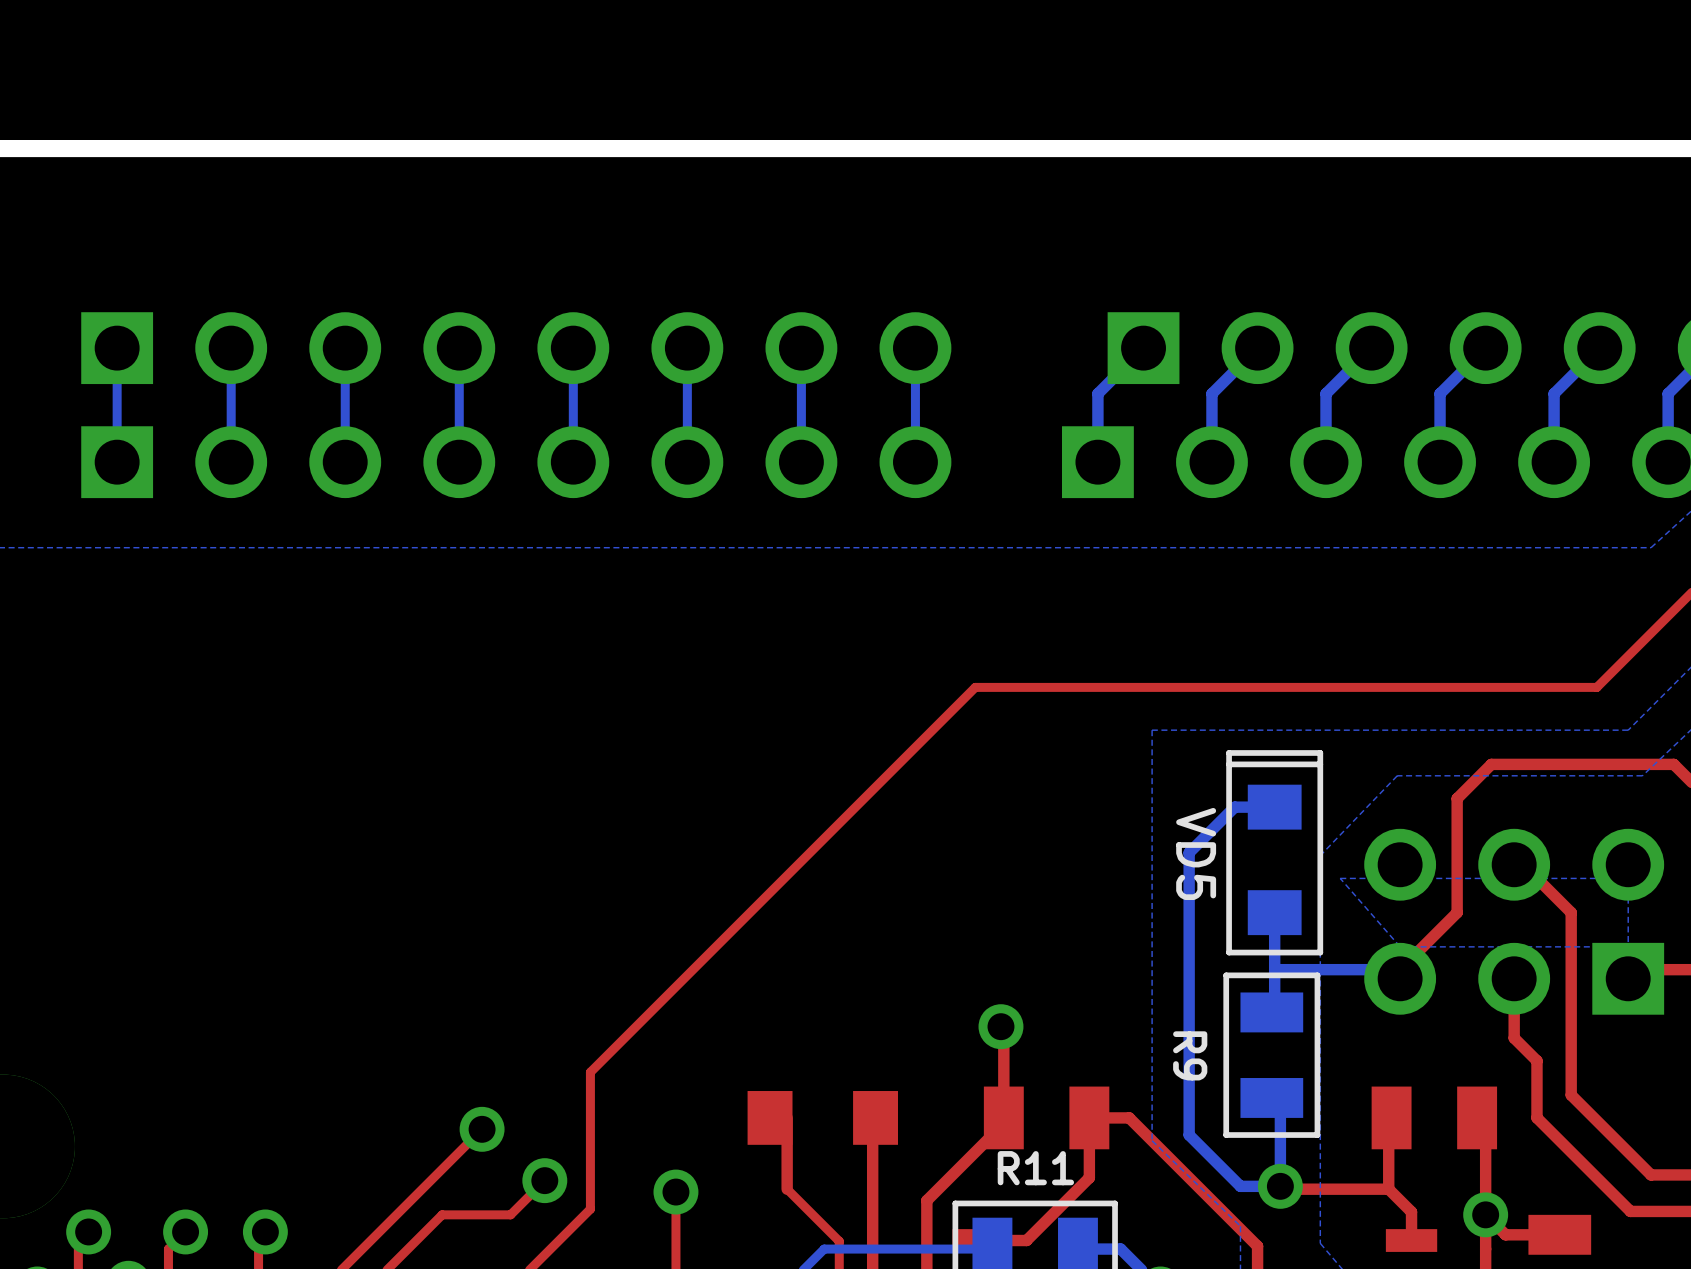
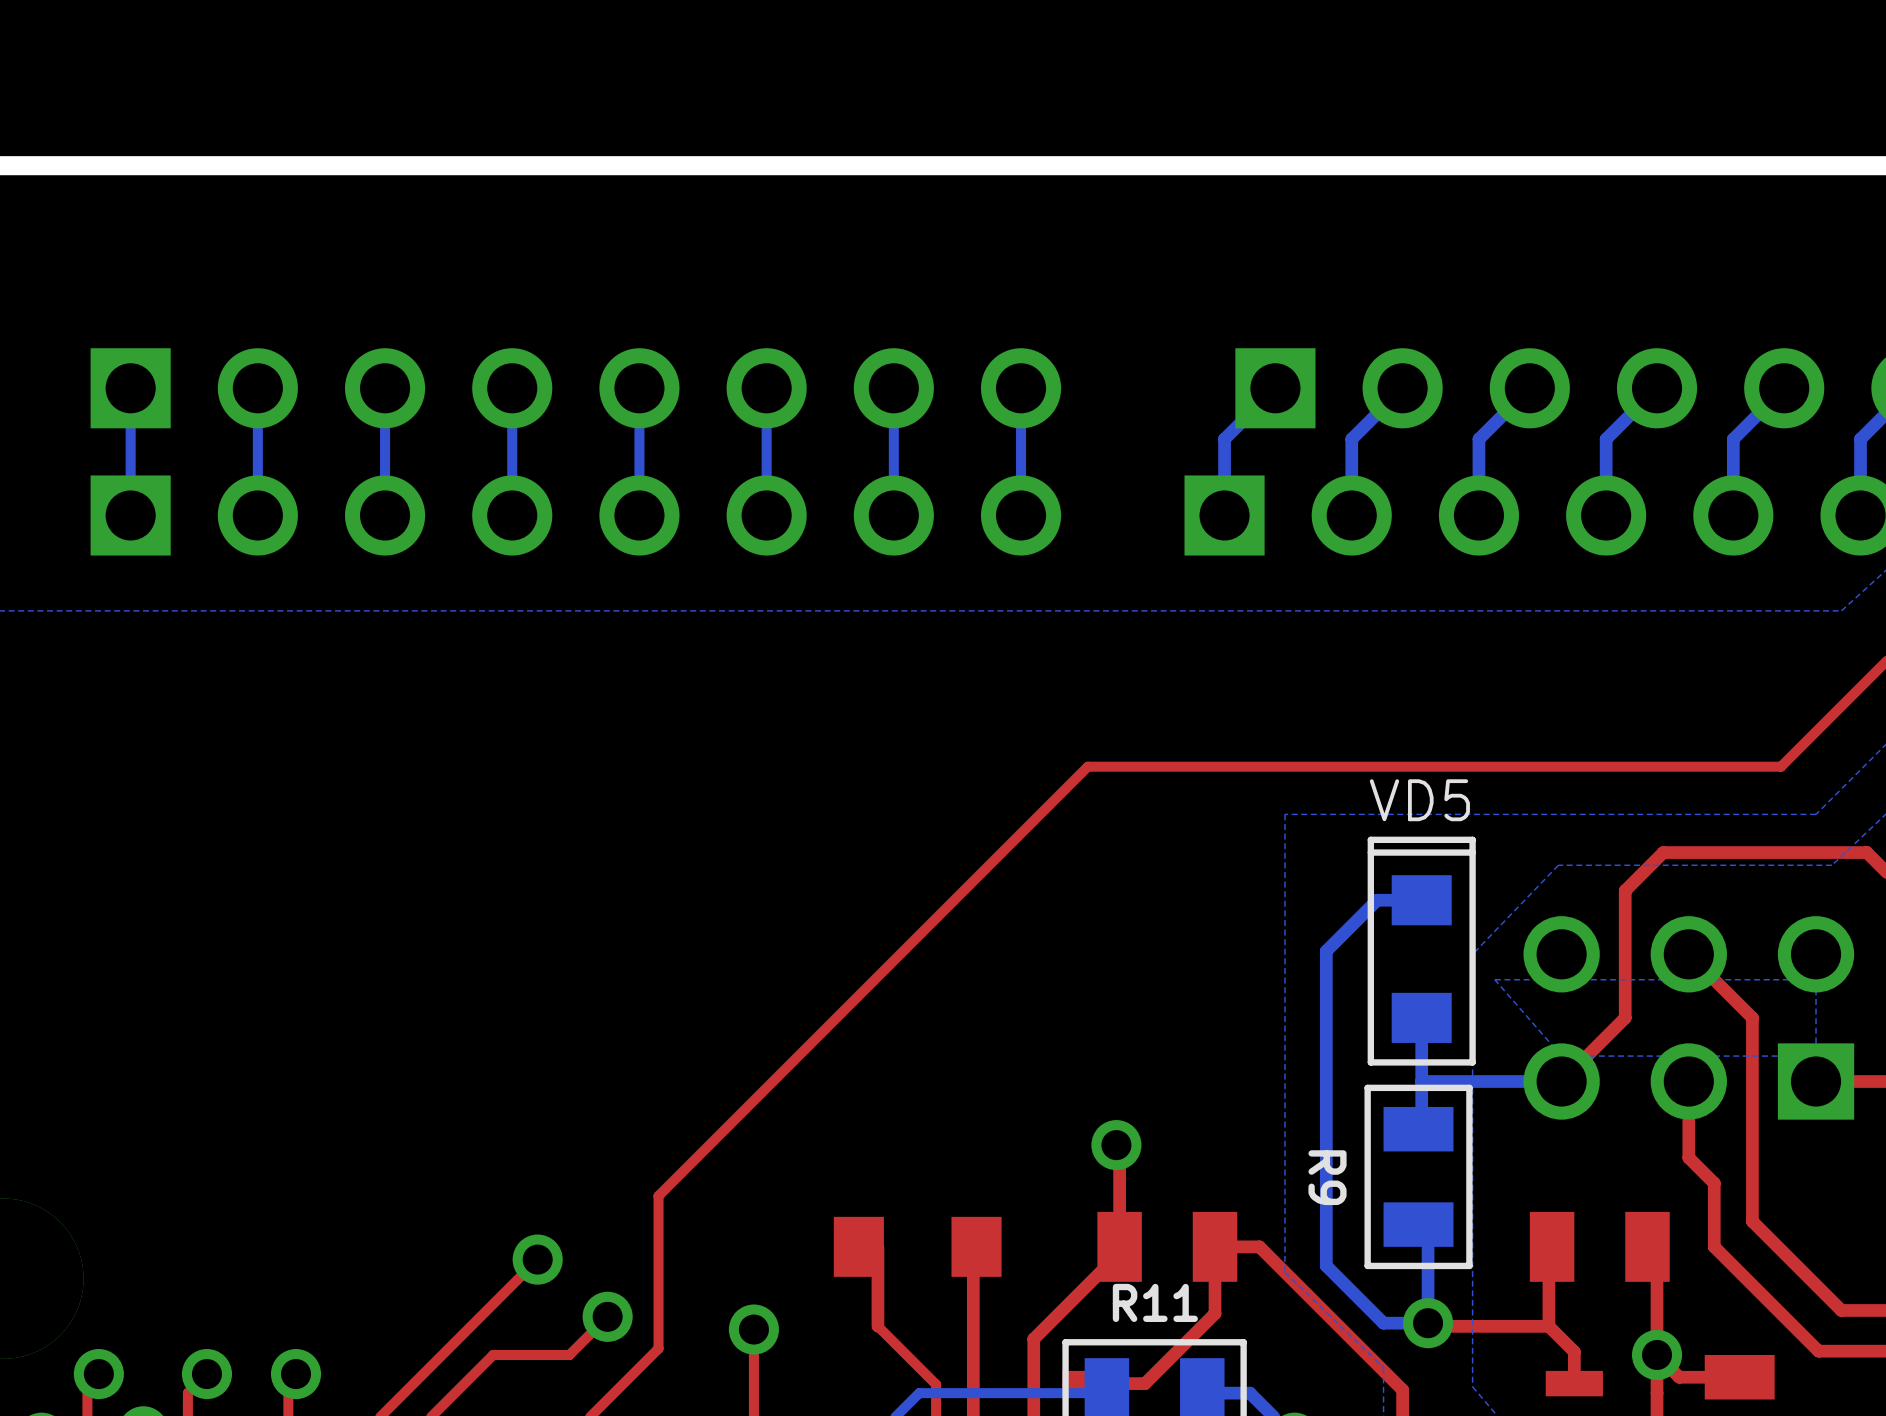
part footprint: [1364, 828, 1665, 1015] -> [1523, 916, 1855, 1120]
VD5 name rotation: 0° (1196, 853) -> 90° counterclockwise (1419, 800)
VD5 name position: VD5 (1196, 853) -> VD5 (1419, 800)

